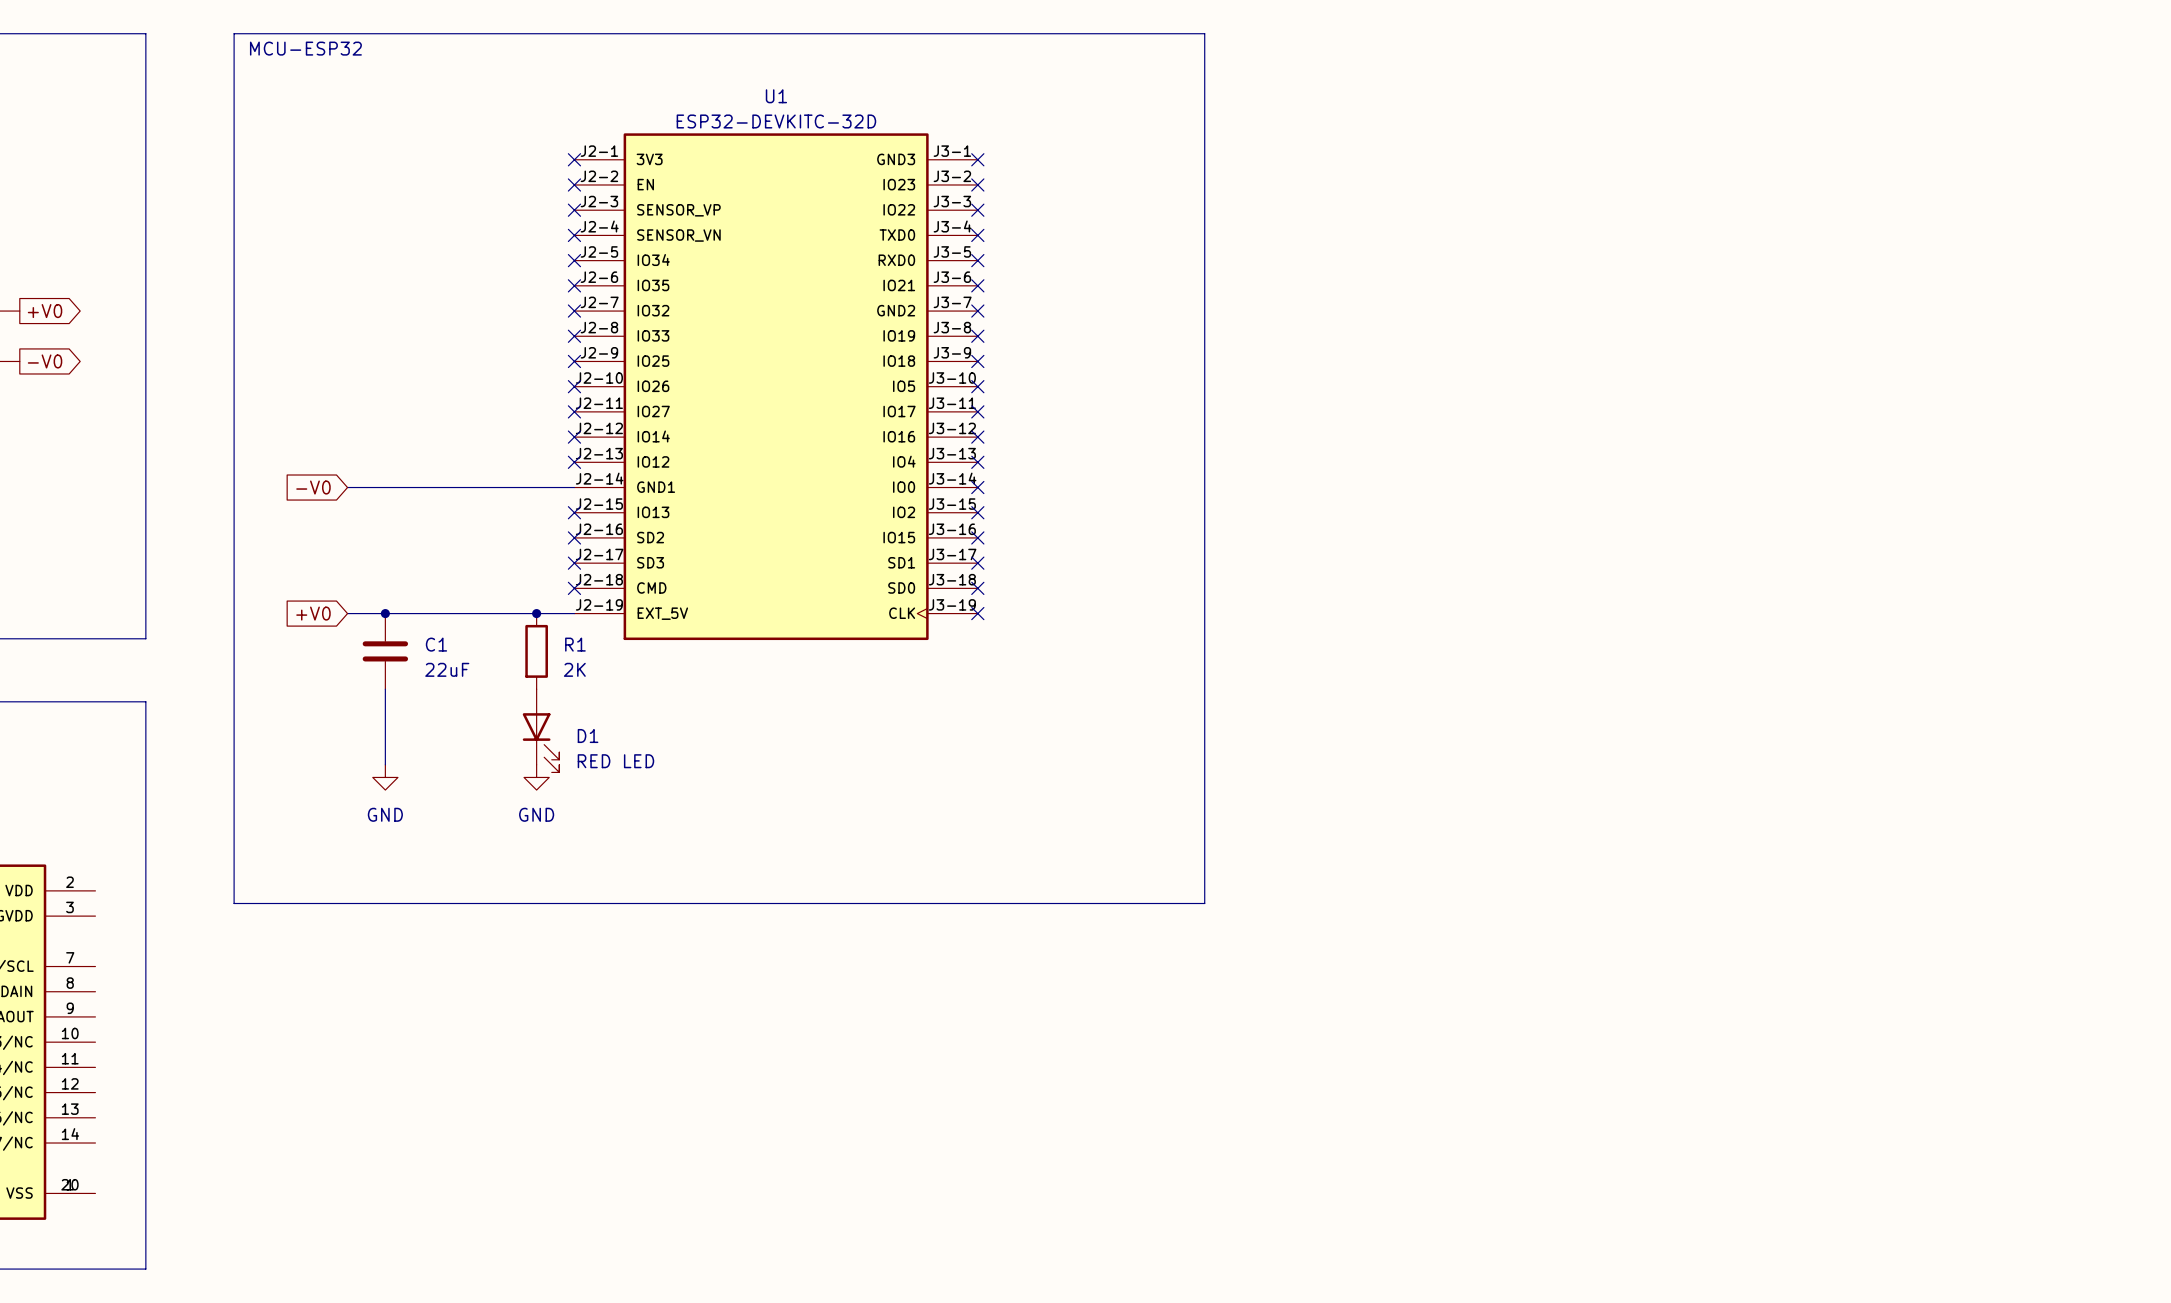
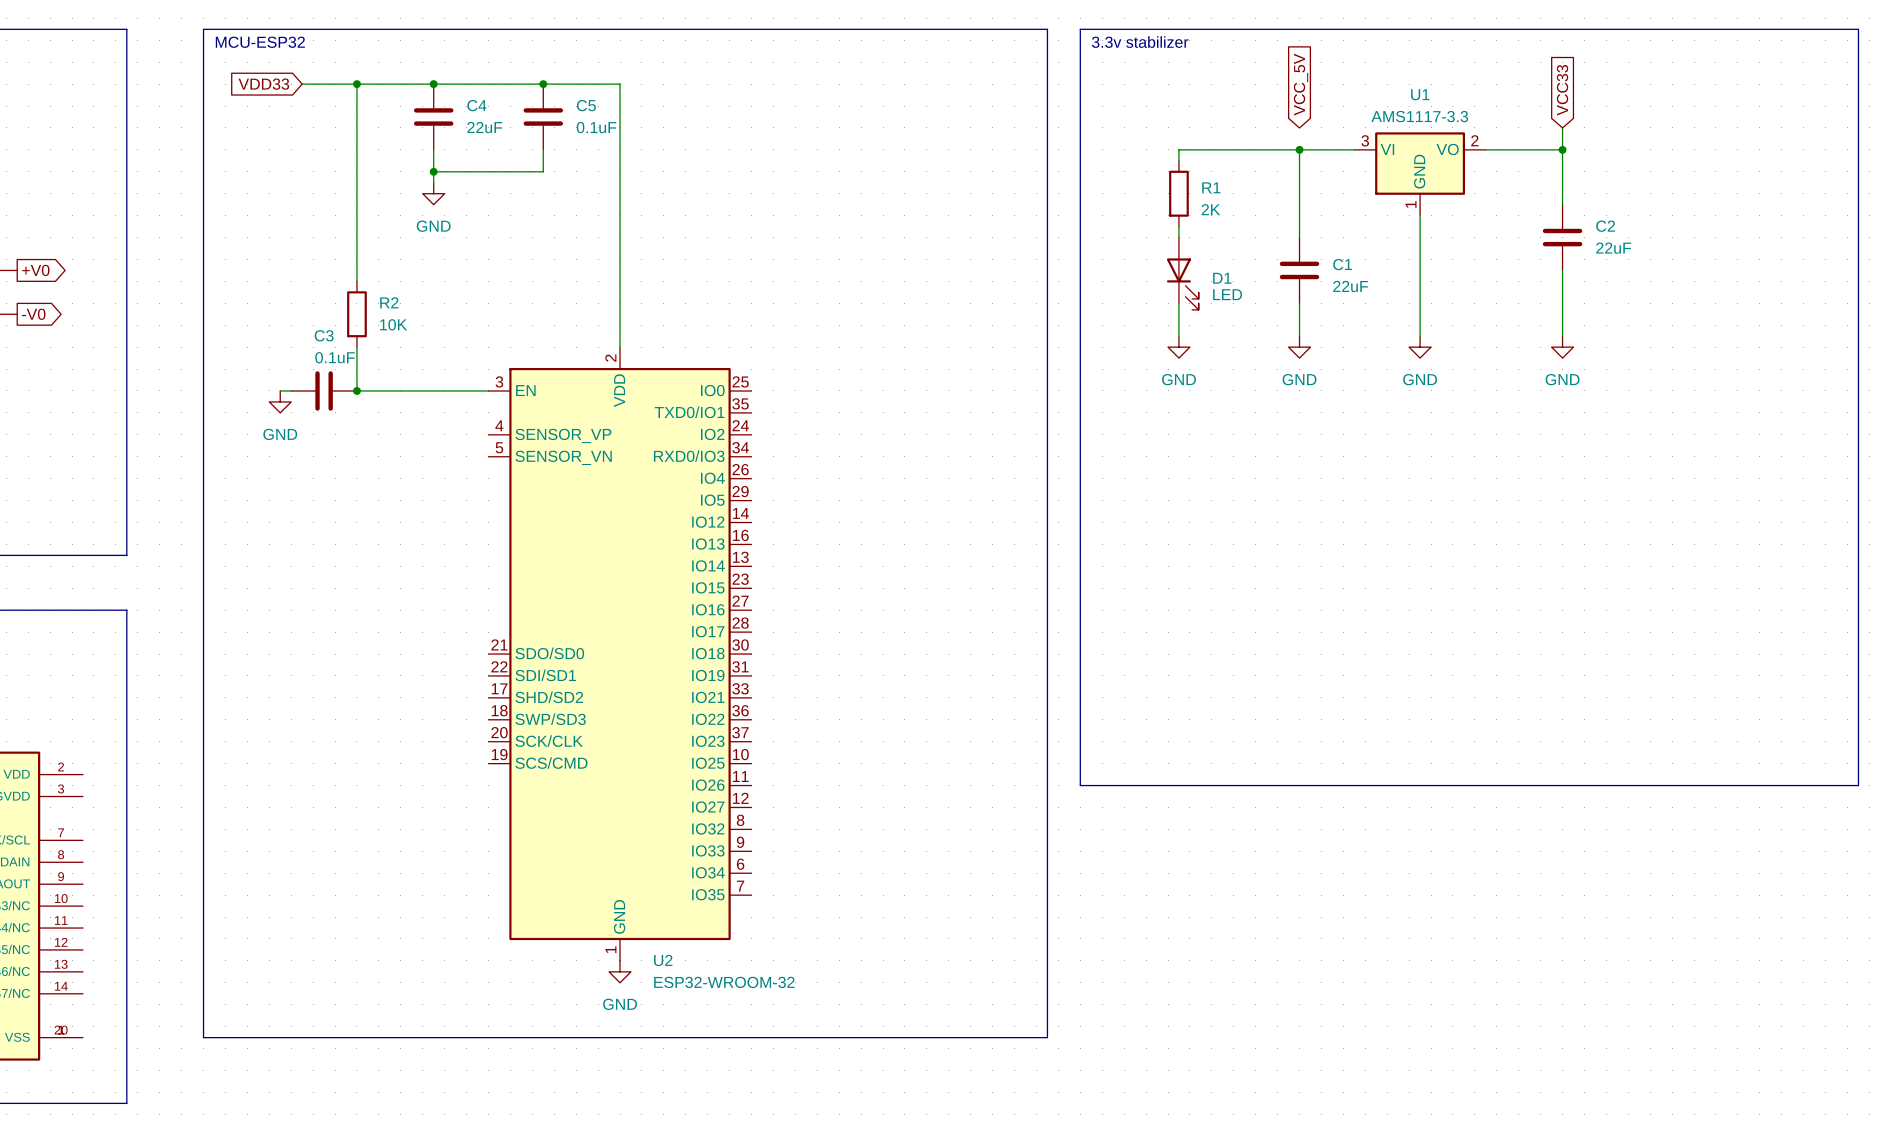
line: none -> (1080, 29) (1080, 785) (1858, 785) (1858, 29) (1080, 29)
text: none -> 3.3v stabilizer (1140, 42)
global label: none -> VDD33 (263, 84)
wire: none -> (302, 84) (620, 84) (620, 347)
wire: none -> (356, 84) (356, 281)
junction: none -> (356, 84)
junction: none -> (433, 84)
junction: none -> (543, 84)
U1 name position: U1 (776, 96) -> U1 (1420, 94)
global label: none -> VCC_5V (1301, 84)
global label: none -> VCC33 (1562, 90)
U1 value: ESP32-DEVKITC-32D (776, 121) -> AMS1117-3.3 (1419, 116)
U1 symbol: [574, 133, 978, 641] -> [1354, 132, 1486, 216]
C4: none -> 22uF (433, 117)
C5: none -> 0.1uF (543, 117)
wire: none -> (1562, 127) (1562, 204)
no-connect mark: (574, 159) -> none
no-connect mark: (977, 159) -> none
wire: none -> (433, 149) (433, 182)
wire: none -> (543, 149) (543, 171) (433, 171)
wire: none -> (1299, 149) (1299, 237)
junction: none -> (1299, 149)
wire: none -> (1354, 149) (1178, 149) (1178, 160)
wire: none -> (1485, 149) (1562, 149)
junction: none -> (1562, 149)
no-connect mark: (574, 184) -> none
no-connect mark: (977, 184) -> none
junction: none -> (433, 171)
no-connect mark: (574, 210) -> none
no-connect mark: (977, 210) -> none
power symbol: none -> GND (433, 193)
no-connect mark: (574, 235) -> none
no-connect mark: (977, 235) -> none
wire: none -> (1420, 215) (1420, 336)
no-connect mark: (574, 260) -> none
no-connect mark: (977, 260) -> none
wire: none -> (1178, 226) (1178, 237)
C2: none -> 22uF (1562, 237)
no-connect mark: (574, 285) -> none
no-connect mark: (977, 285) -> none
no-connect mark: (574, 311) -> none
no-connect mark: (977, 311) -> none
wire: none -> (1562, 270) (1562, 336)
no-connect mark: (574, 336) -> none
no-connect mark: (977, 336) -> none
wire: none -> (1178, 303) (1178, 336)
wire: none -> (1299, 303) (1299, 336)
R2: none -> 10K (356, 314)
no-connect mark: (574, 361) -> none
no-connect mark: (977, 361) -> none
no-connect mark: (574, 386) -> none
no-connect mark: (977, 386) -> none
wire: none -> (356, 347) (356, 390) (488, 390)
power symbol: none -> GND (1178, 347)
power symbol: none -> GND (1299, 347)
power symbol: none -> GND (1420, 347)
power symbol: none -> GND (1562, 347)
no-connect mark: (574, 411) -> none
no-connect mark: (977, 411) -> none
no-connect mark: (574, 437) -> none
no-connect mark: (977, 437) -> none
wire: none -> (280, 390) (291, 390)
C3: none -> 0.1uF (324, 390)
junction: none -> (356, 390)
power symbol: none -> GND (280, 401)
no-connect mark: (574, 462) -> none
no-connect mark: (977, 462) -> none
global label: -V0 (313, 487) -> none
wire: (347, 487) (574, 487) -> none
no-connect mark: (977, 487) -> none
no-connect mark: (574, 512) -> none
no-connect mark: (977, 512) -> none
no-connect mark: (574, 537) -> none
no-connect mark: (977, 537) -> none
no-connect mark: (574, 563) -> none
no-connect mark: (977, 563) -> none
no-connect mark: (574, 588) -> none
no-connect mark: (977, 588) -> none
global label: +V0 (313, 613) -> none
wire: (347, 613) (574, 613) -> none
junction: (385, 613) -> none
junction: (536, 613) -> none
no-connect mark: (977, 613) -> none
C1 position: (385, 651) -> (1299, 270)
R1 position: (536, 651) -> (1178, 193)
wire: (385, 689) (385, 764) -> none
D1 position: (541, 730) -> (1182, 273)
U2: none -> ESP32-WROOM-32 (620, 654)
D1 value: RED LED (615, 761) -> LED (1227, 294)
power symbol: GND (385, 777) -> none
power symbol: GND (536, 777) -> none
line: (234, 903) (1204, 903) -> (203, 785) (203, 1037) (1047, 1037) (1047, 785)
power symbol: none -> GND (620, 971)

